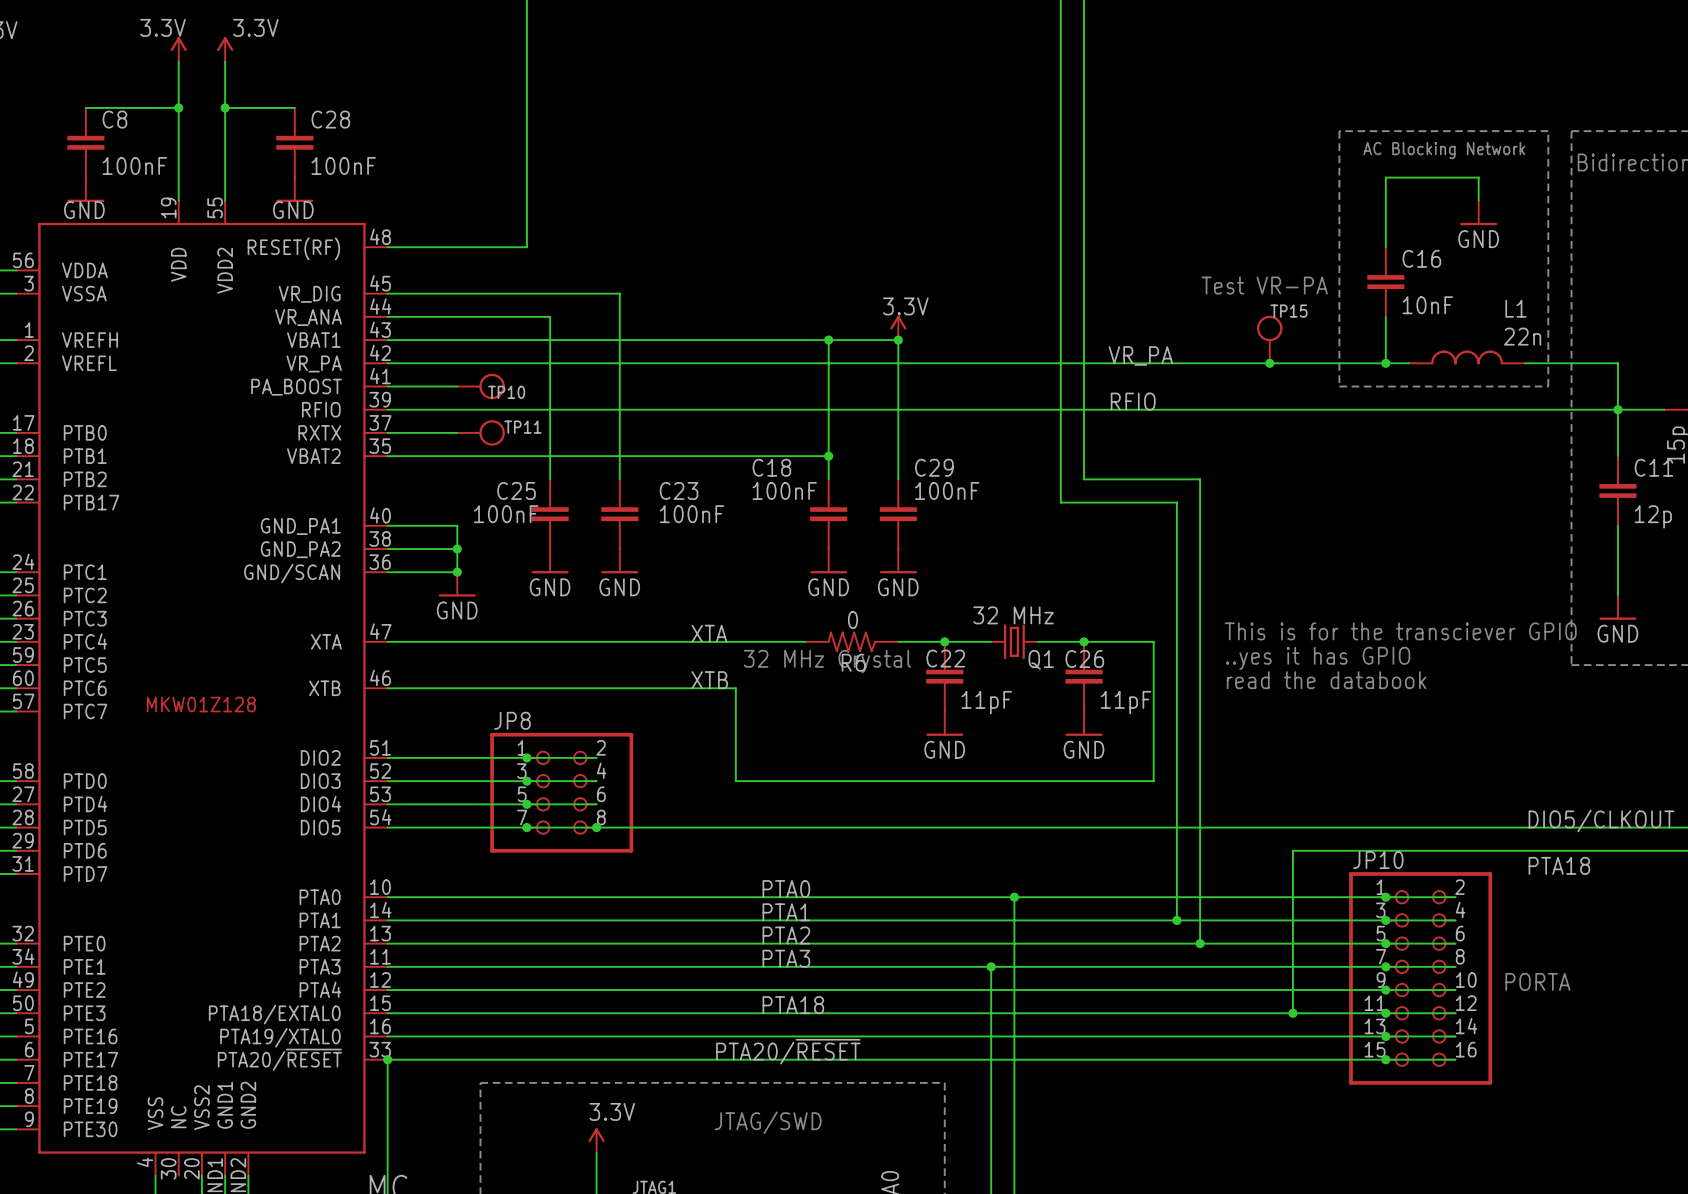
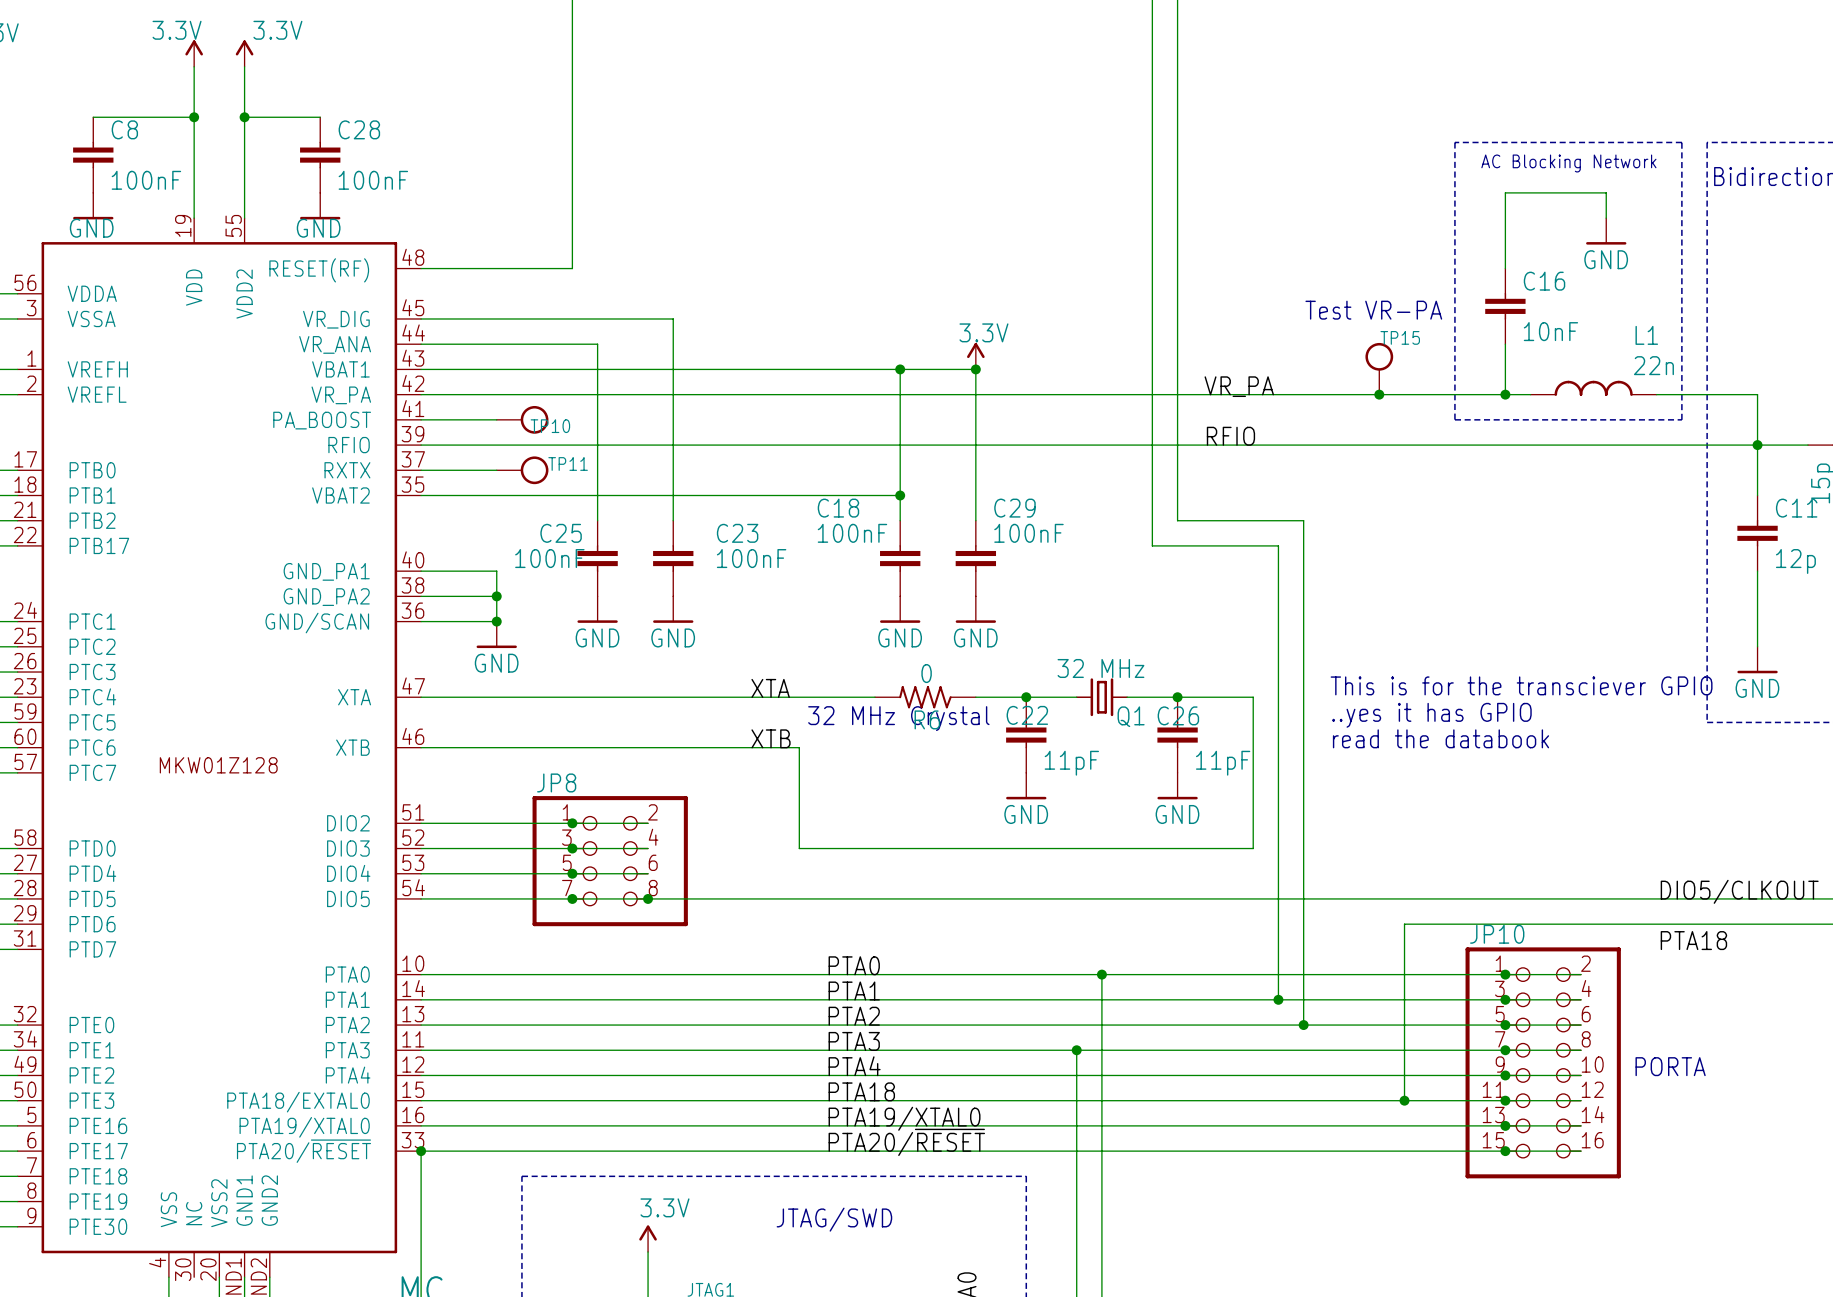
label: none -> PTA4 (854, 1066)
label: none -> PTA19/XTAL0 (904, 1118)
label position: PTA20/~{RESET} (788, 1051) -> PTA20/~{RESET} (906, 1142)

